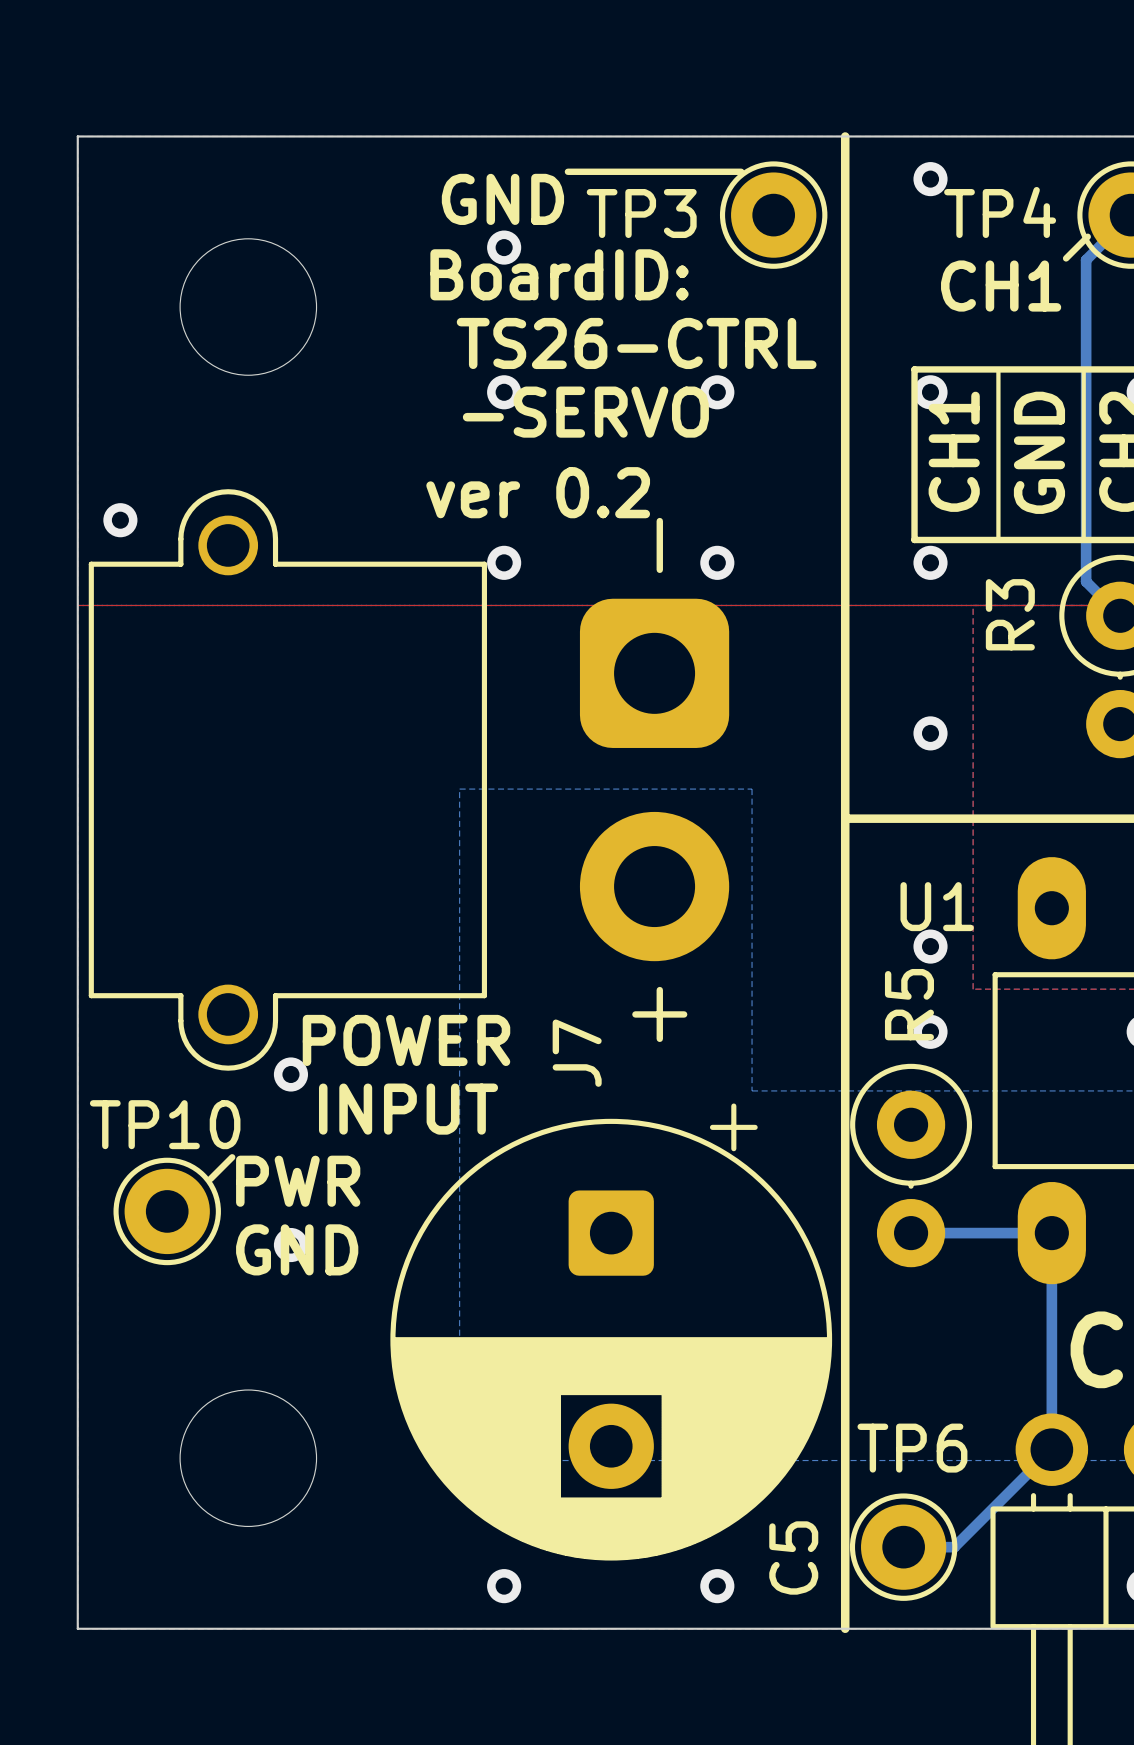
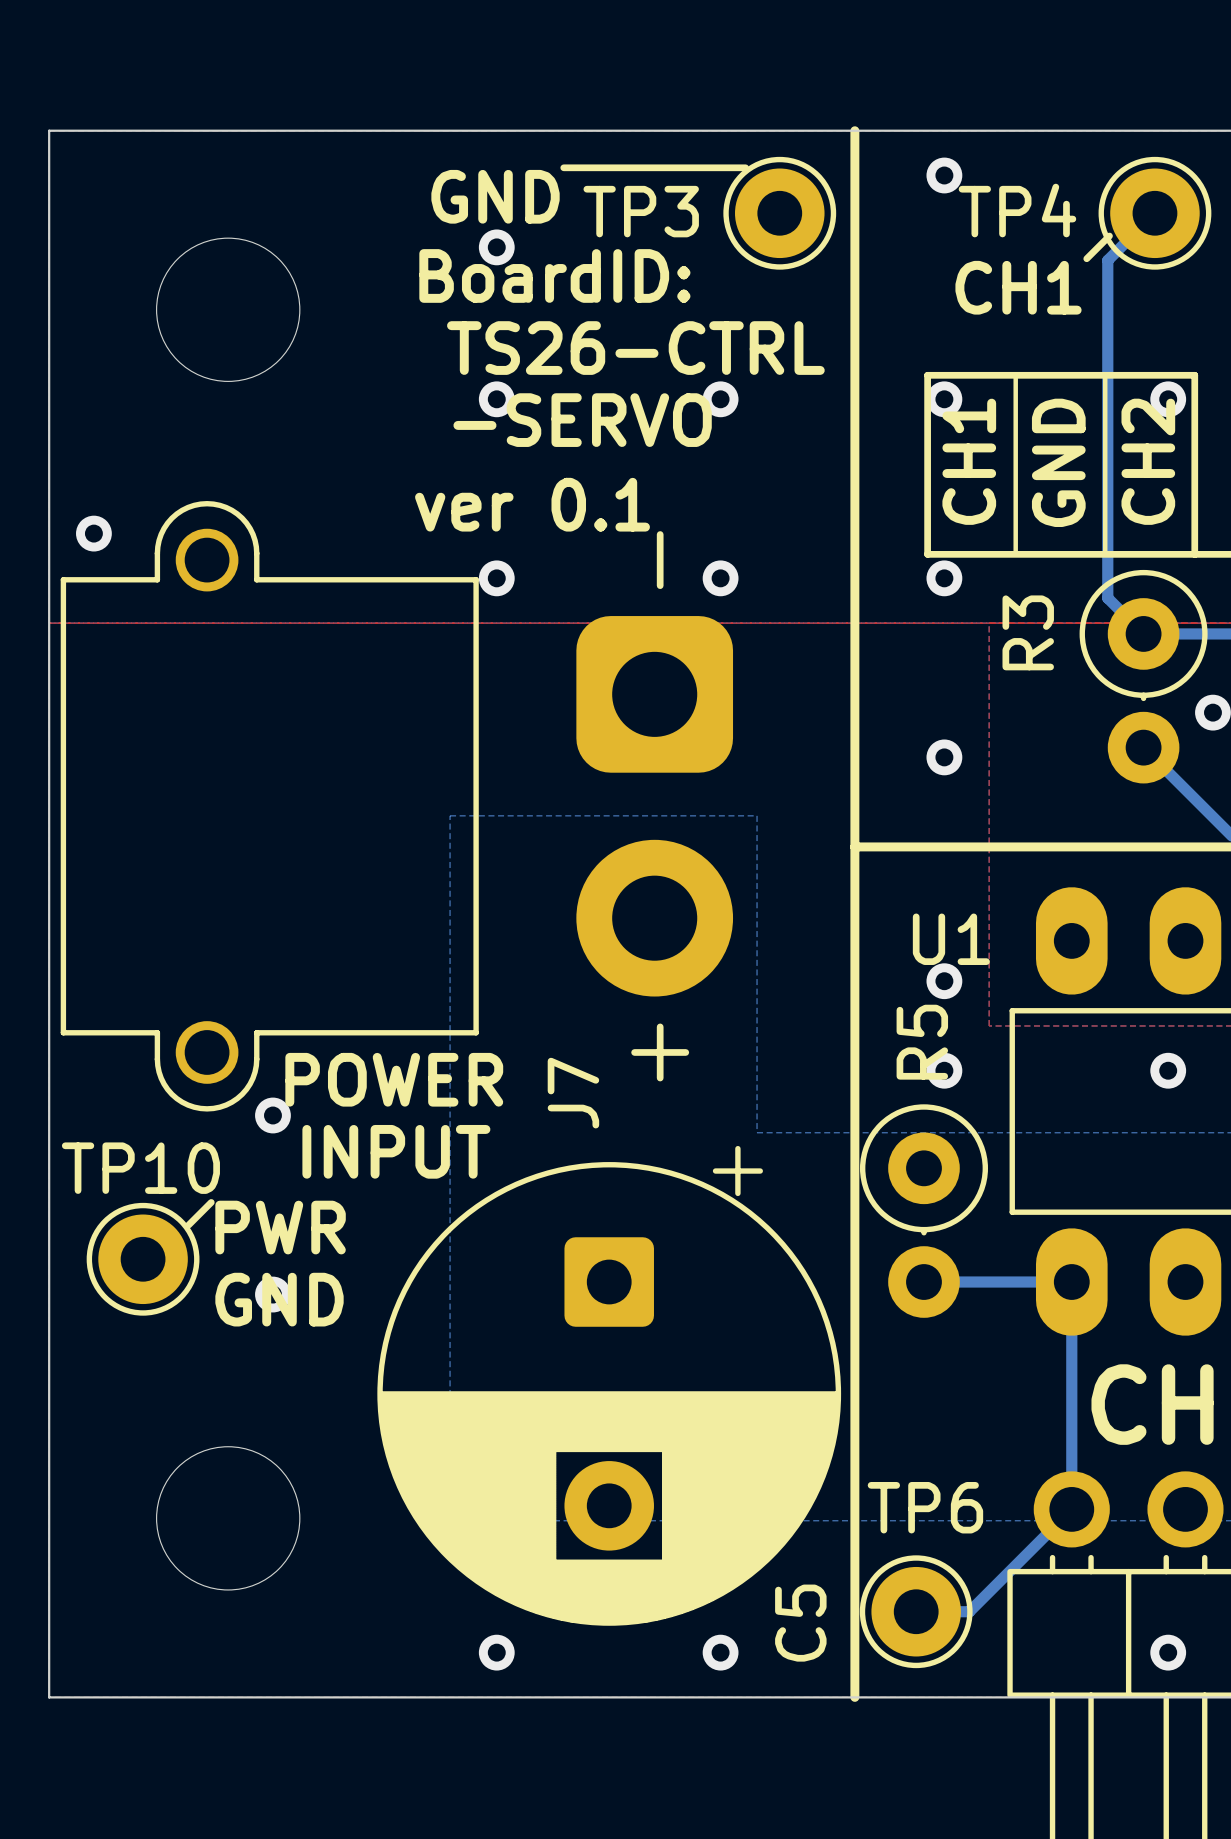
text: ver 0.2 (538, 492) -> ver 0.1 (532, 504)

